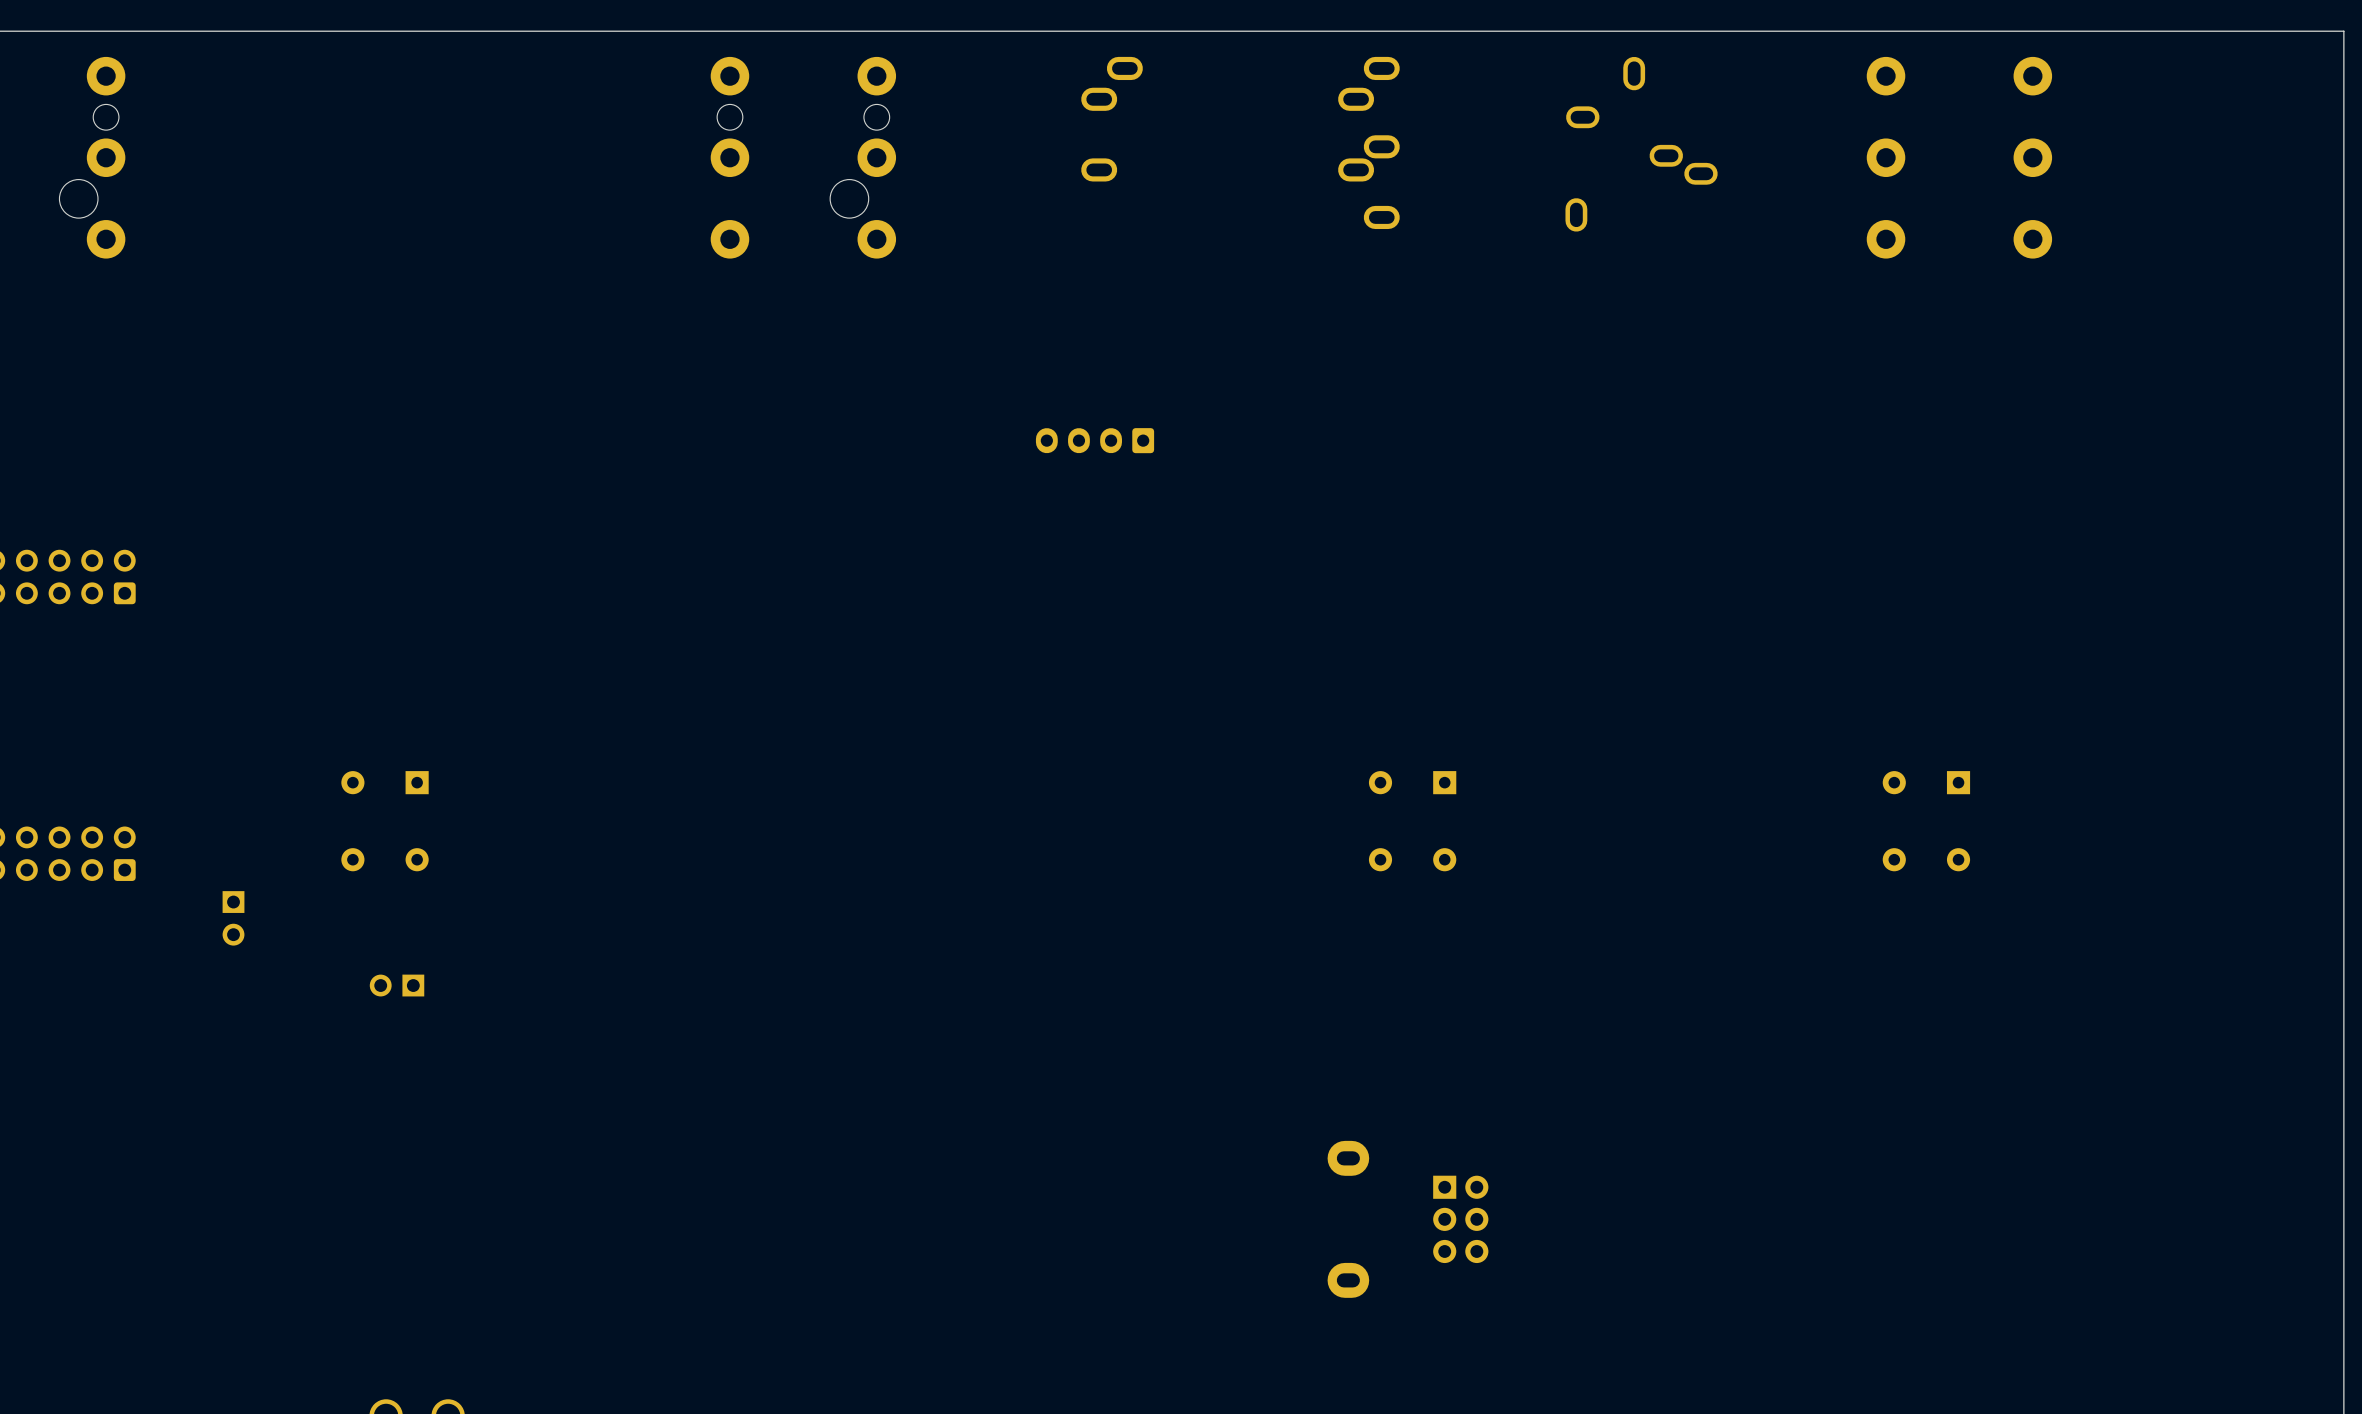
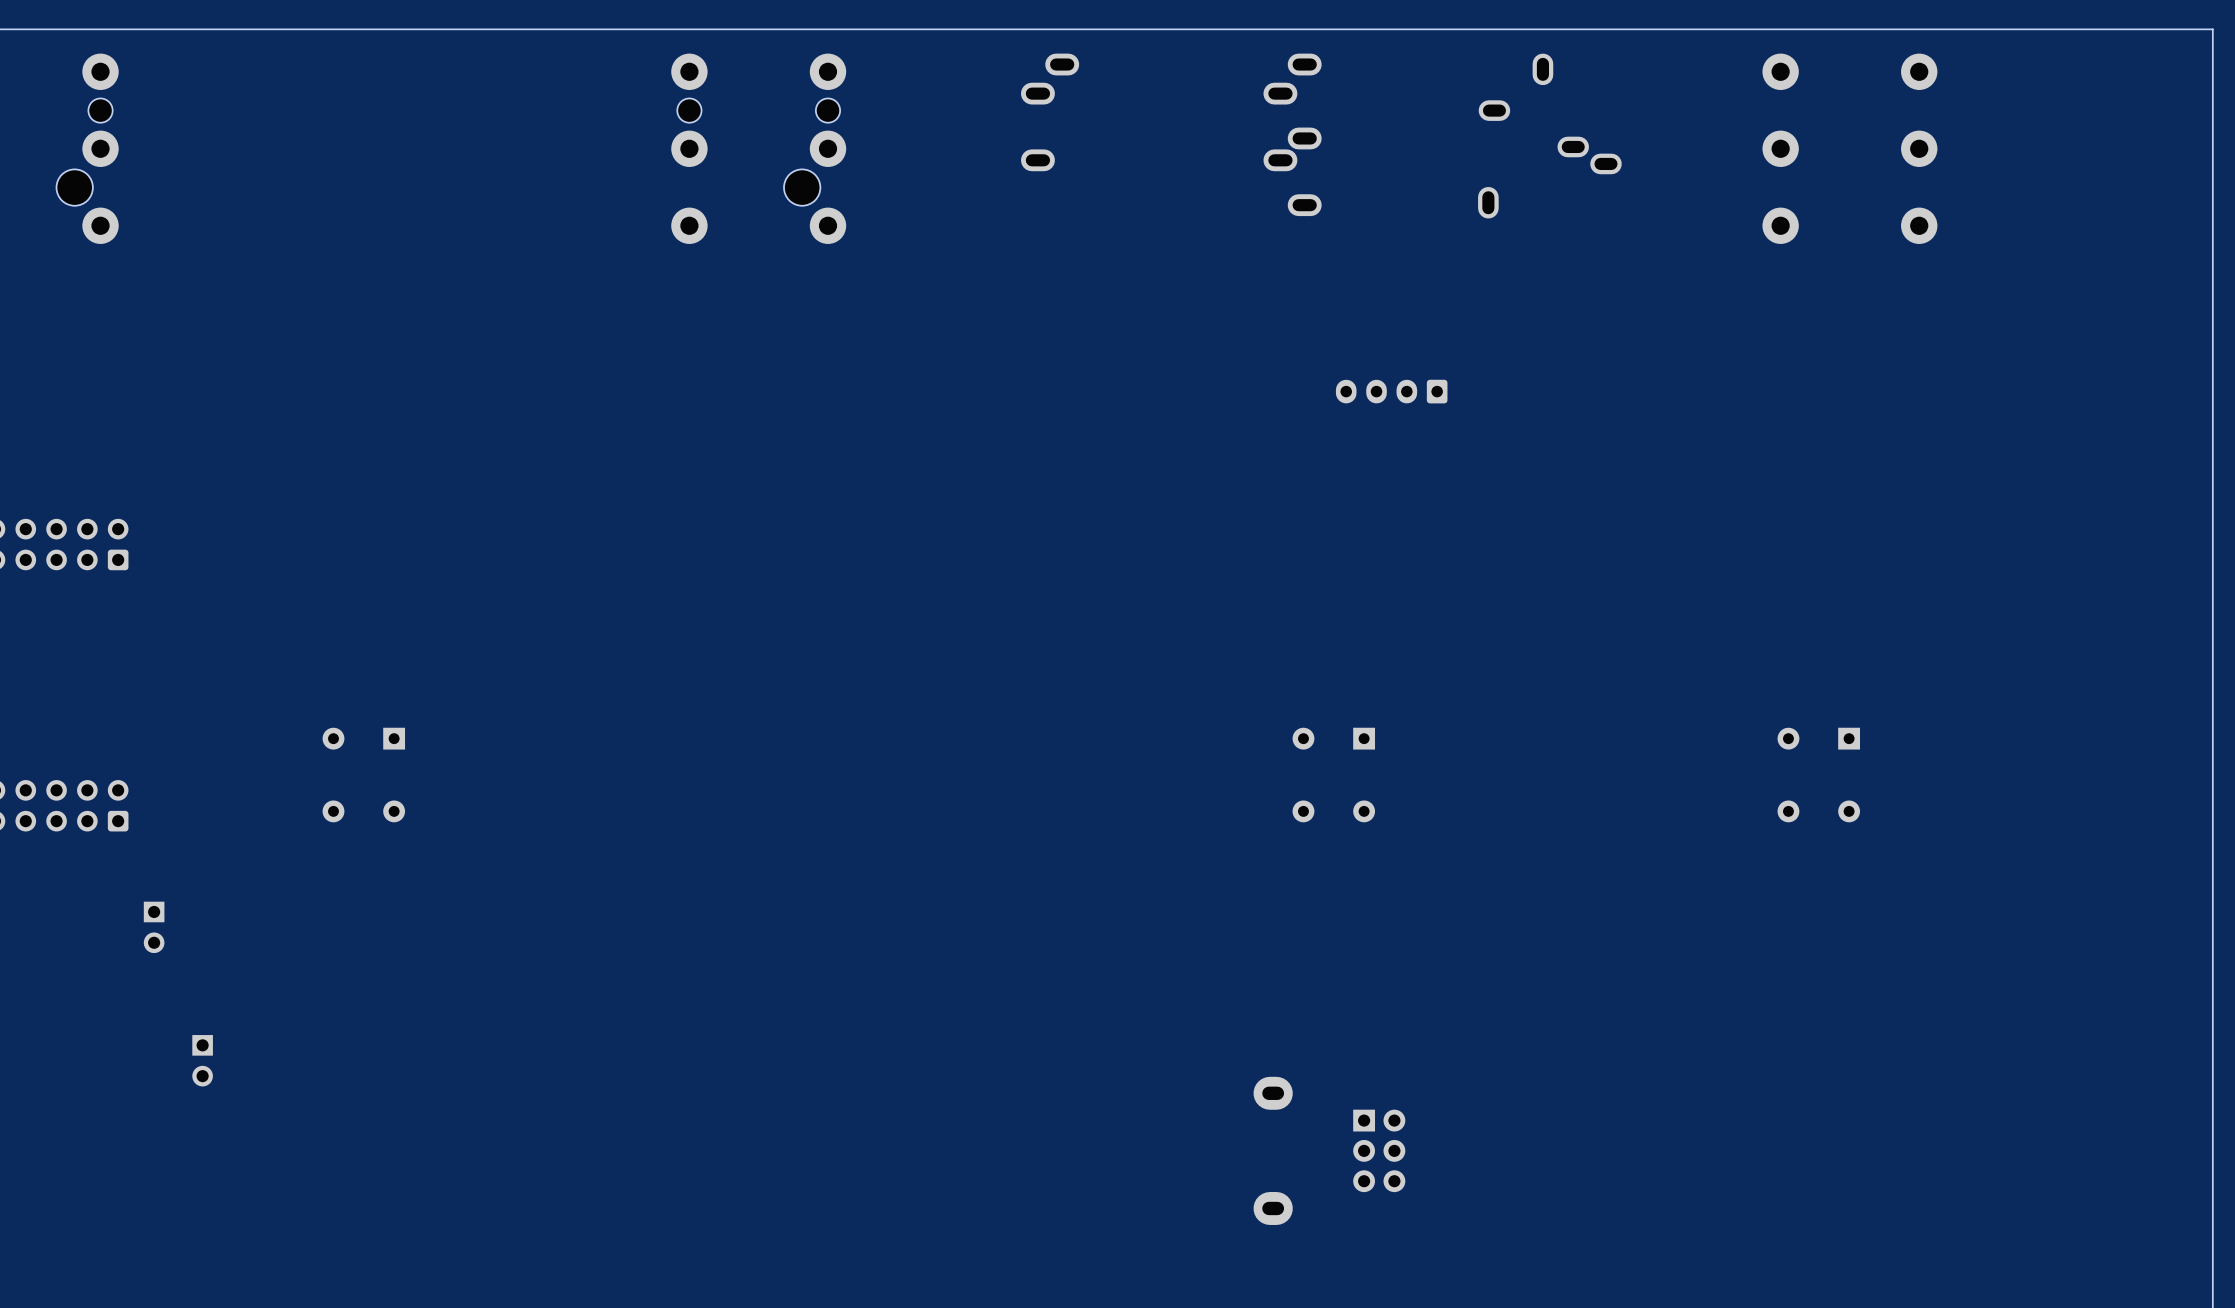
part: none -> (1391, 391)
part: (1095, 440) -> none
part position: (233, 918) -> (154, 927)
part: (397, 985) -> none
part: none -> (202, 1060)

